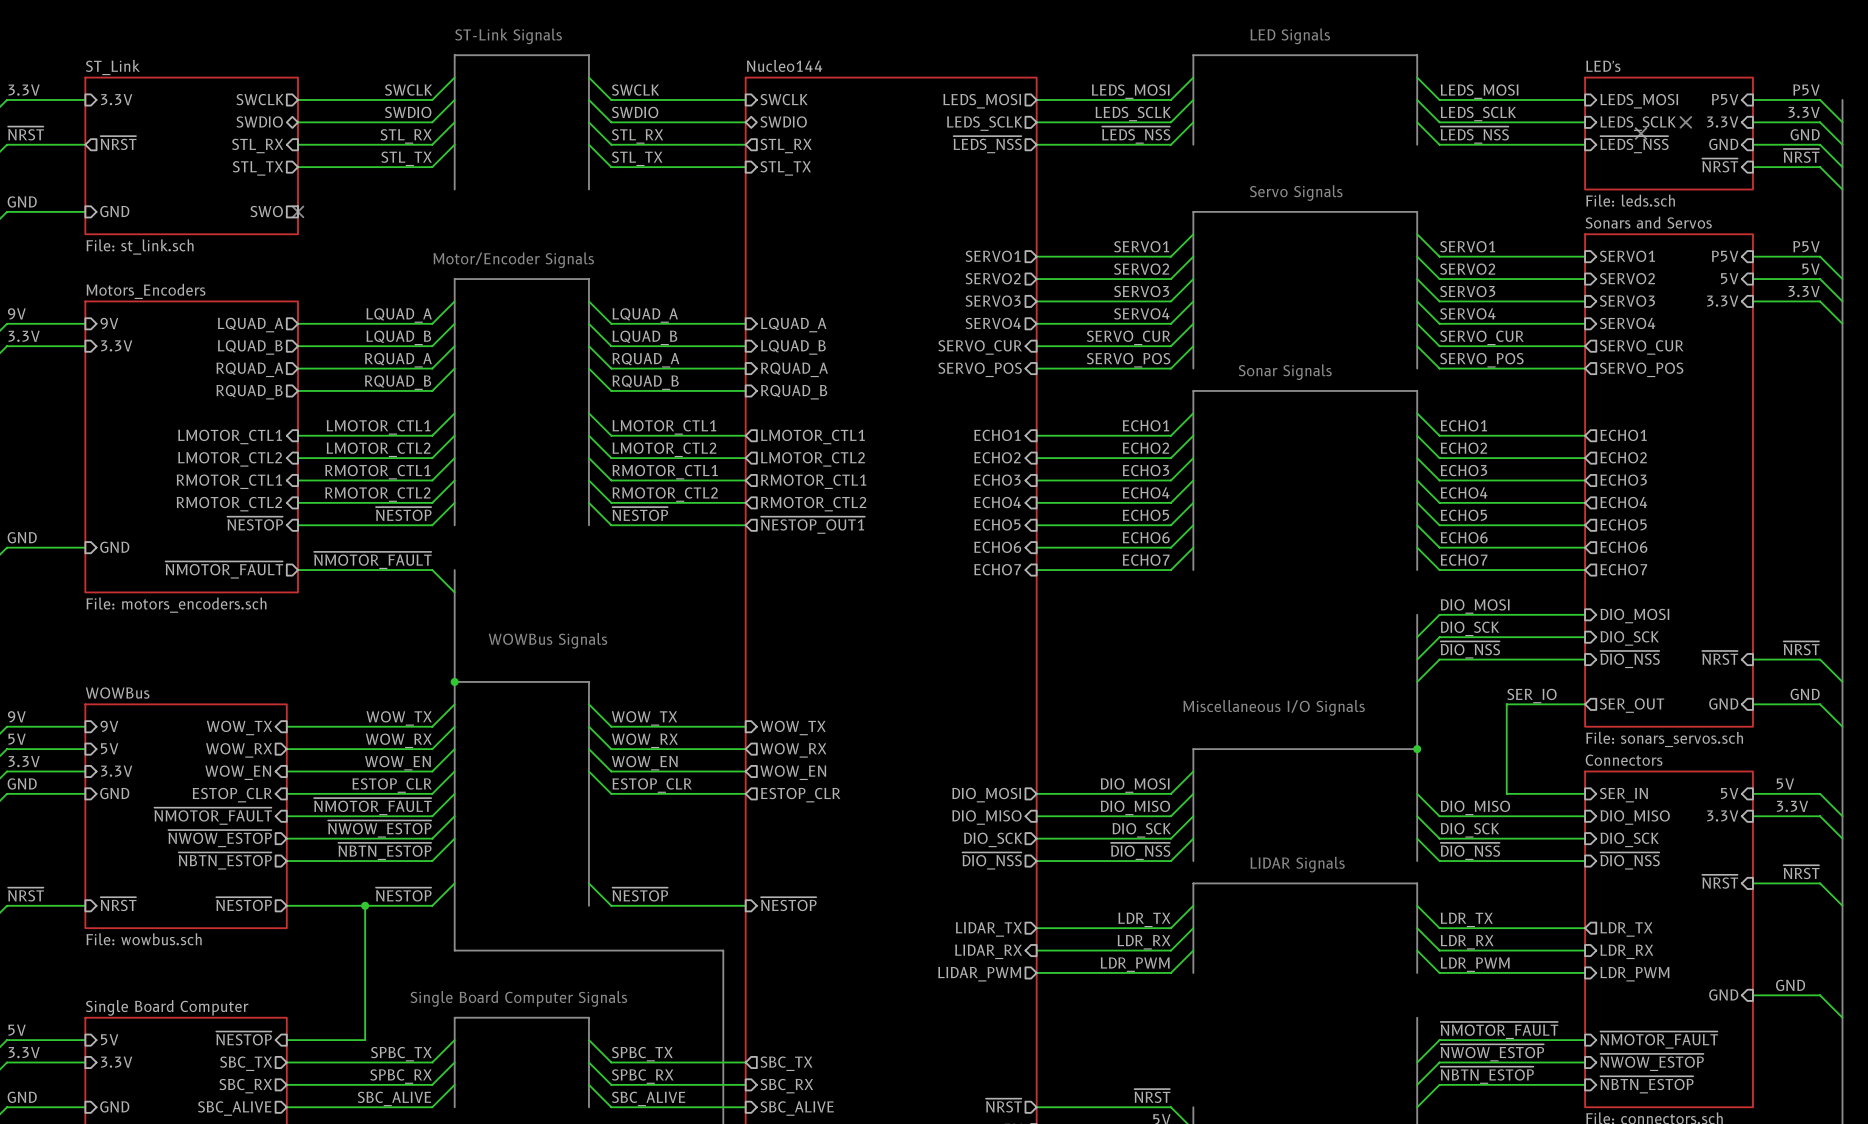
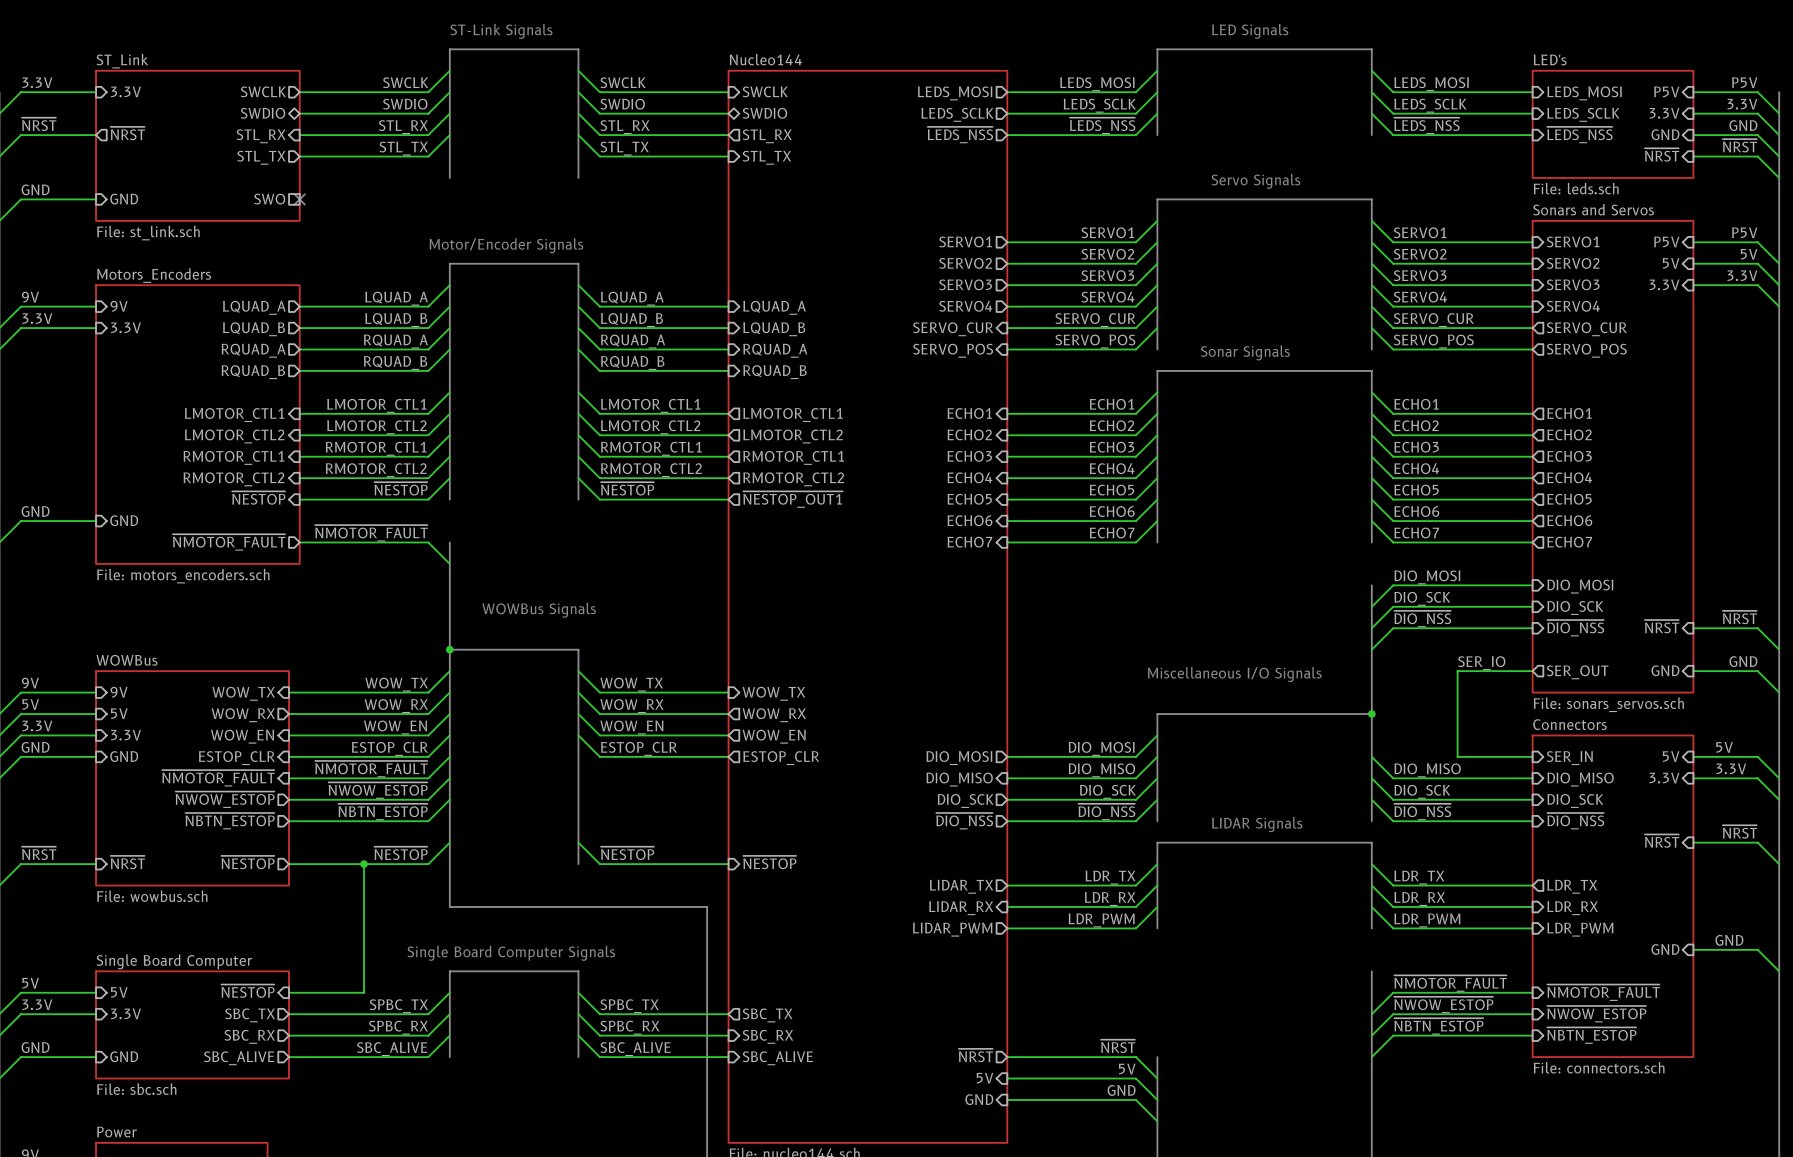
no-connect mark: (1685, 122) -> none
no-connect mark: (1641, 133) -> none

